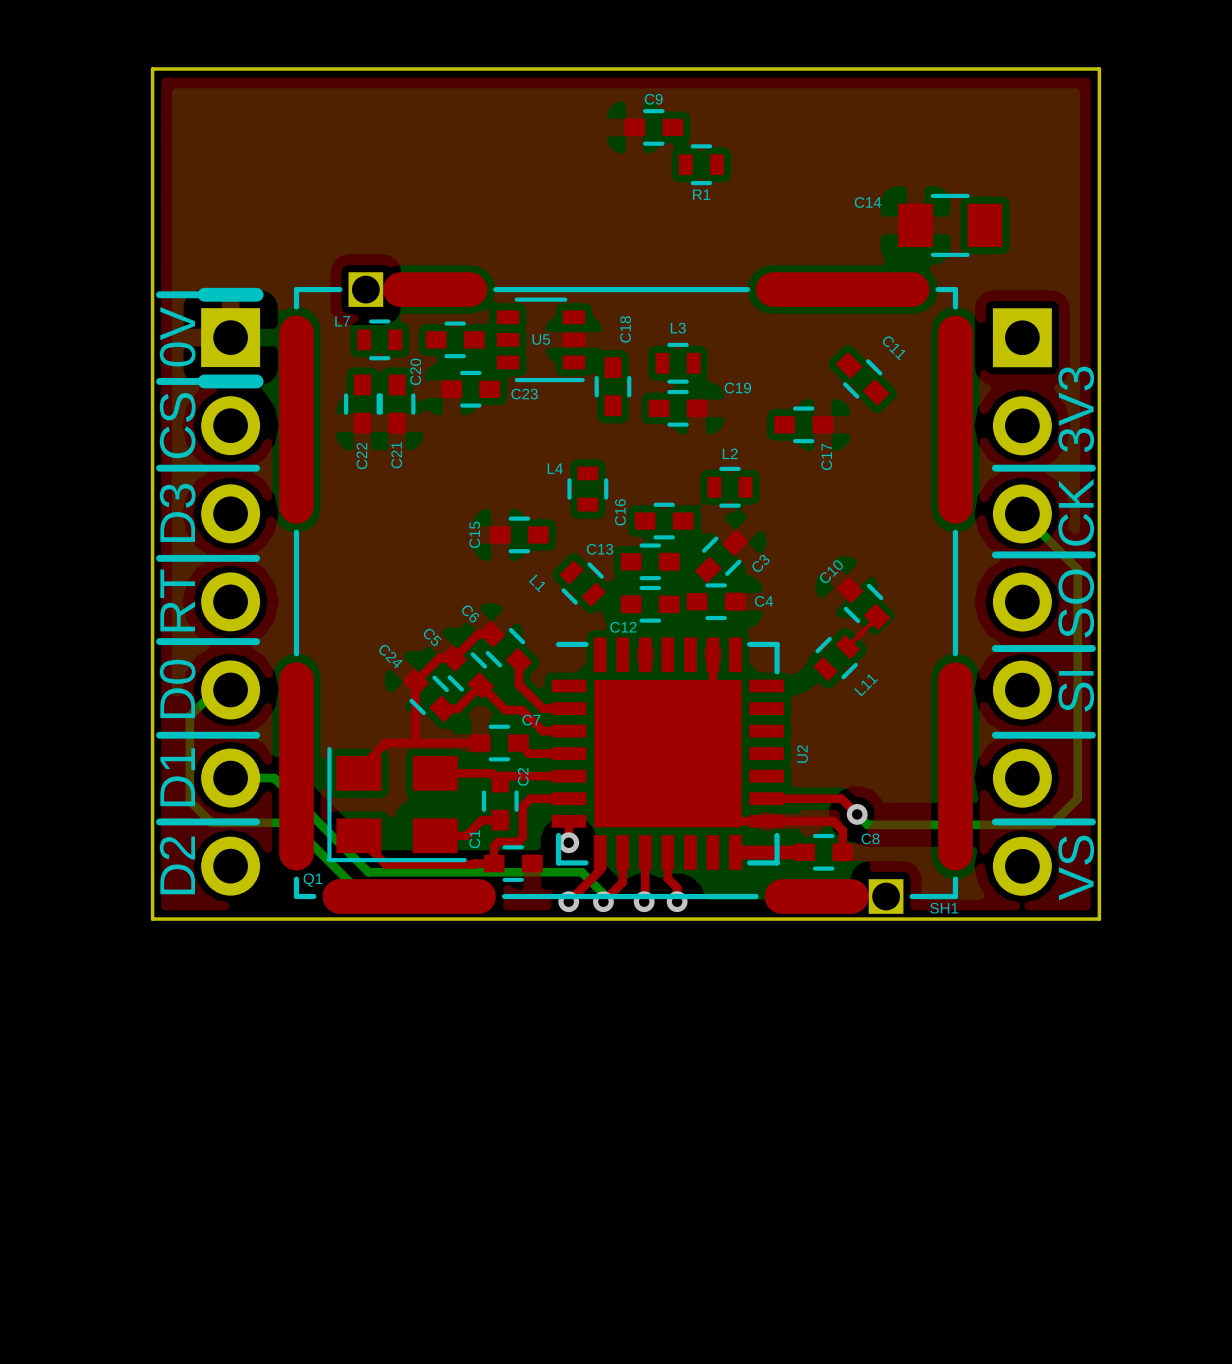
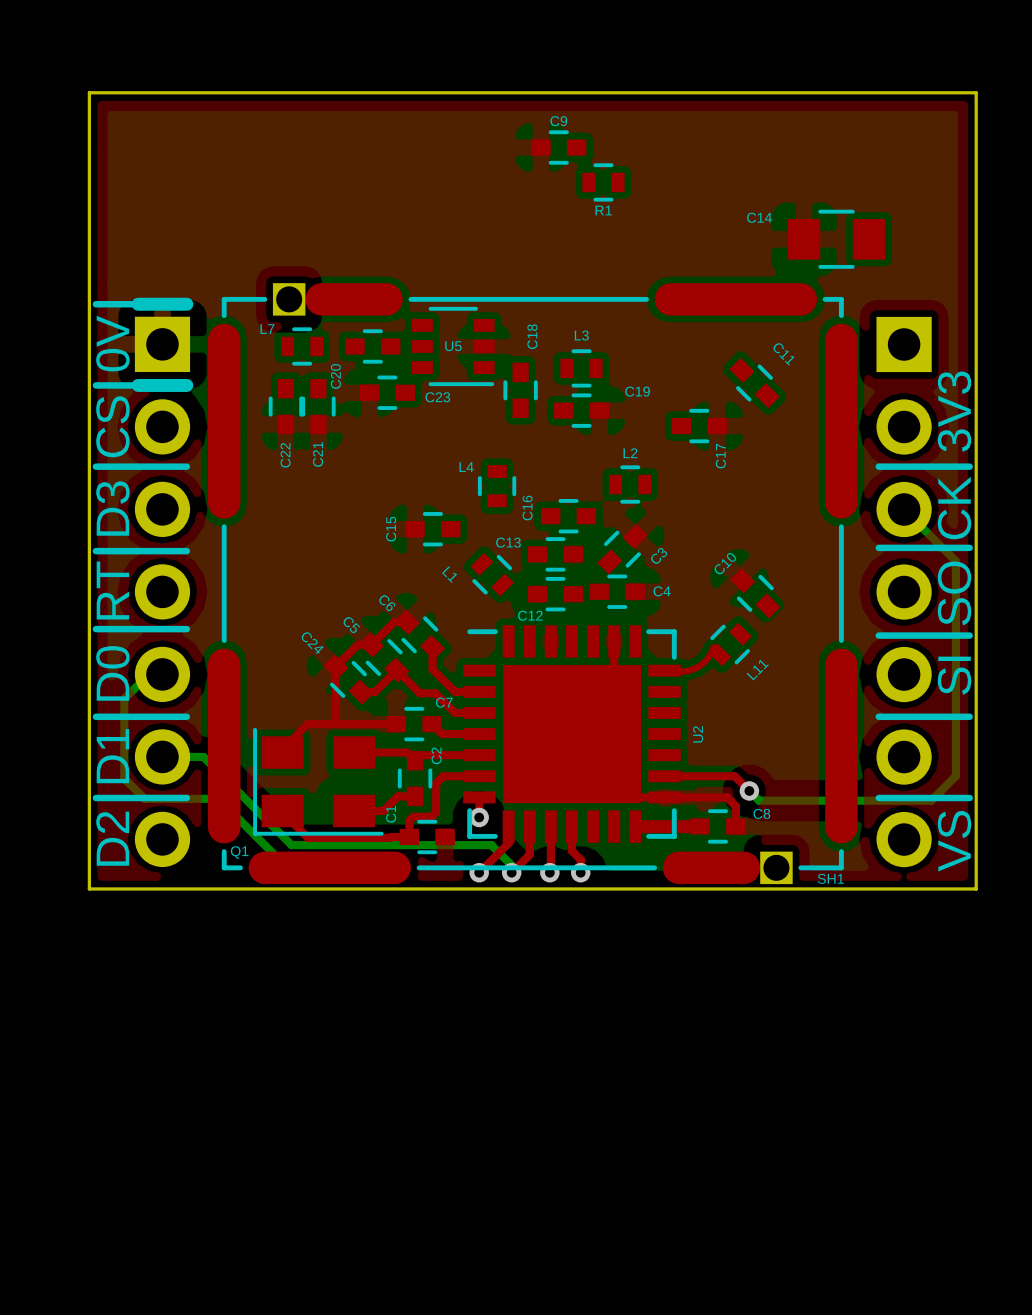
top track: (877, 616) (847, 647) -> none
top track: none -> (713, 647) (708, 657) (699, 665) (689, 670) (677, 671)

